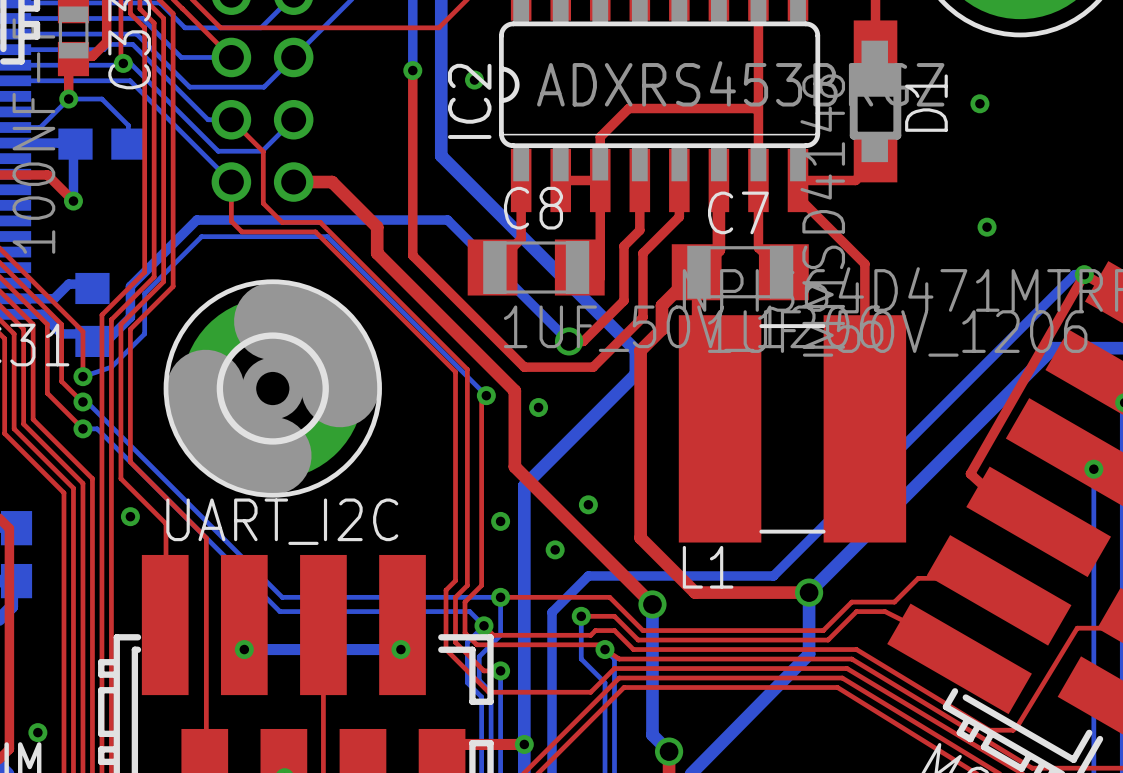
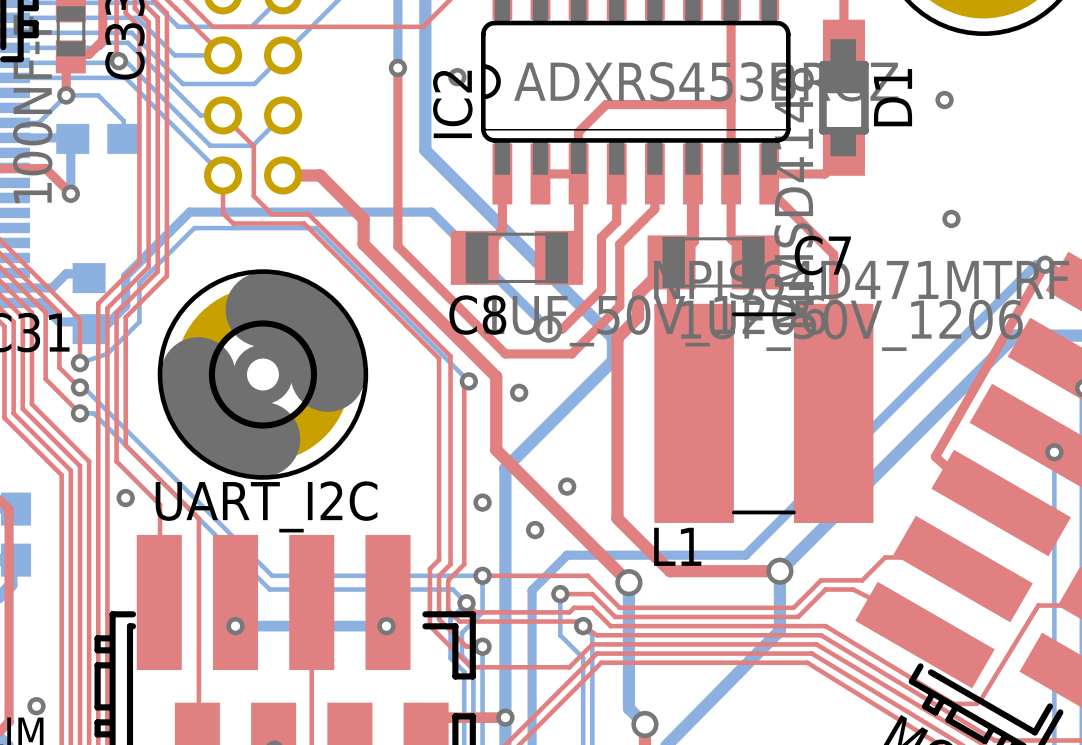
C8 name position: C8 (533, 208) -> C8 (477, 315)
C7 name position: C7 (738, 212) -> C7 (822, 255)

